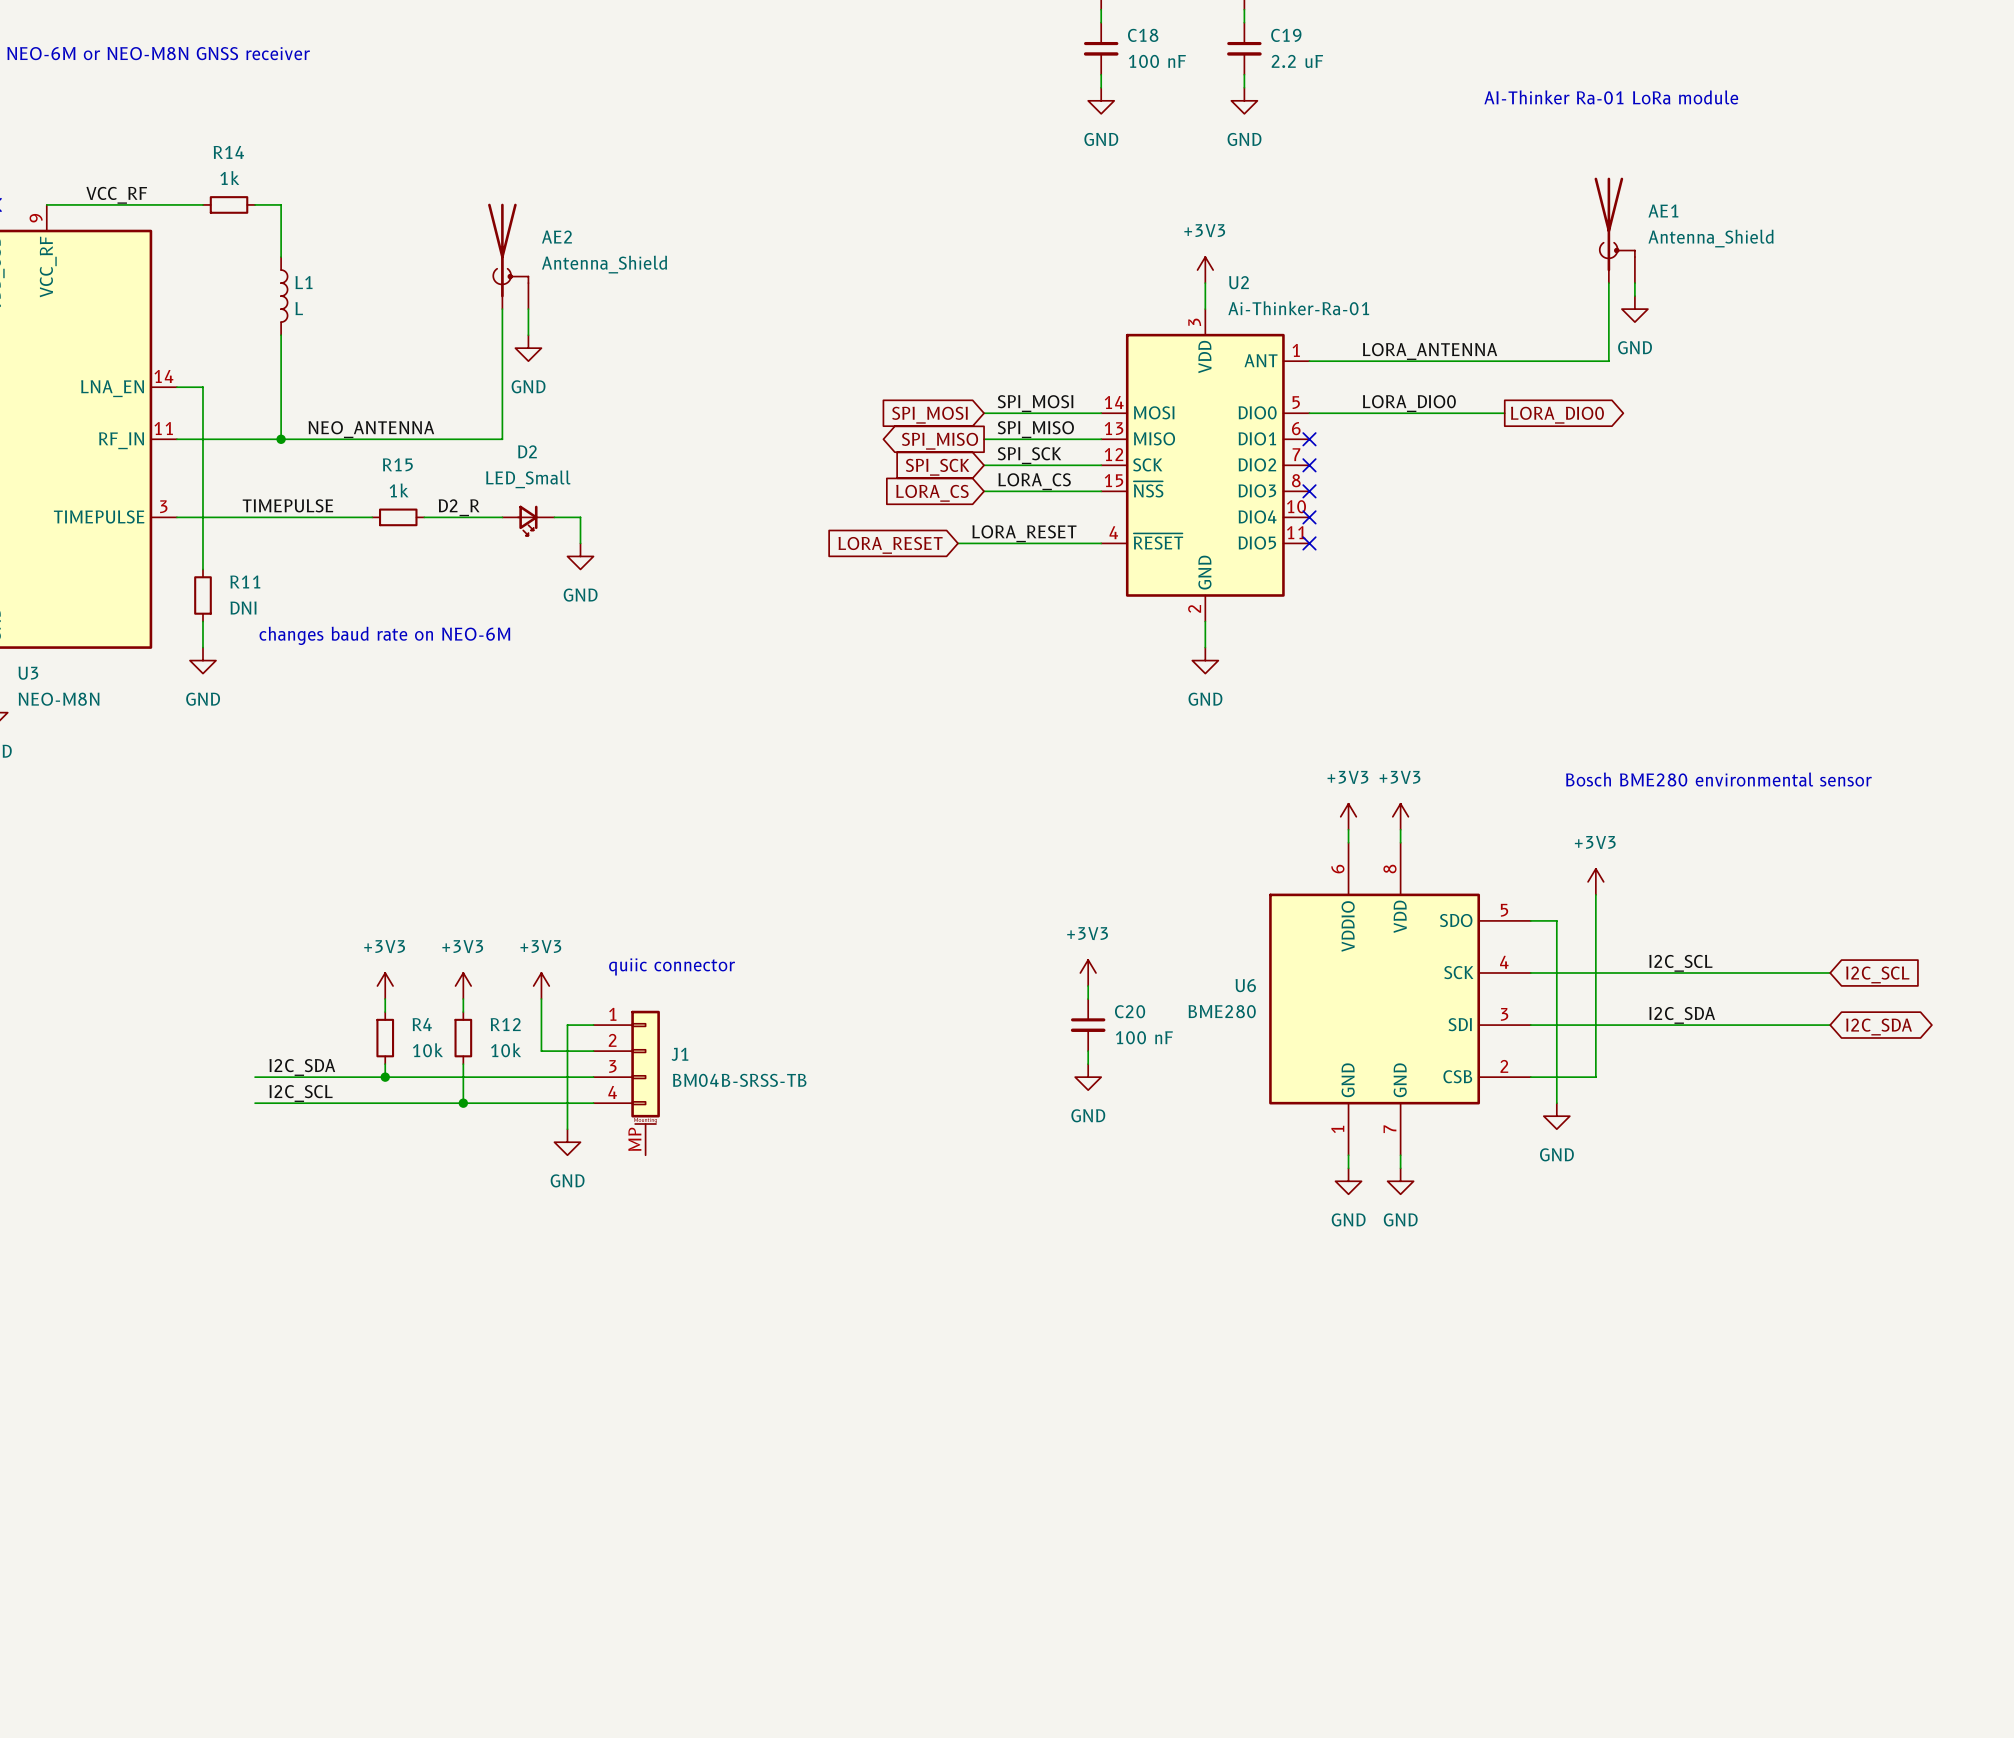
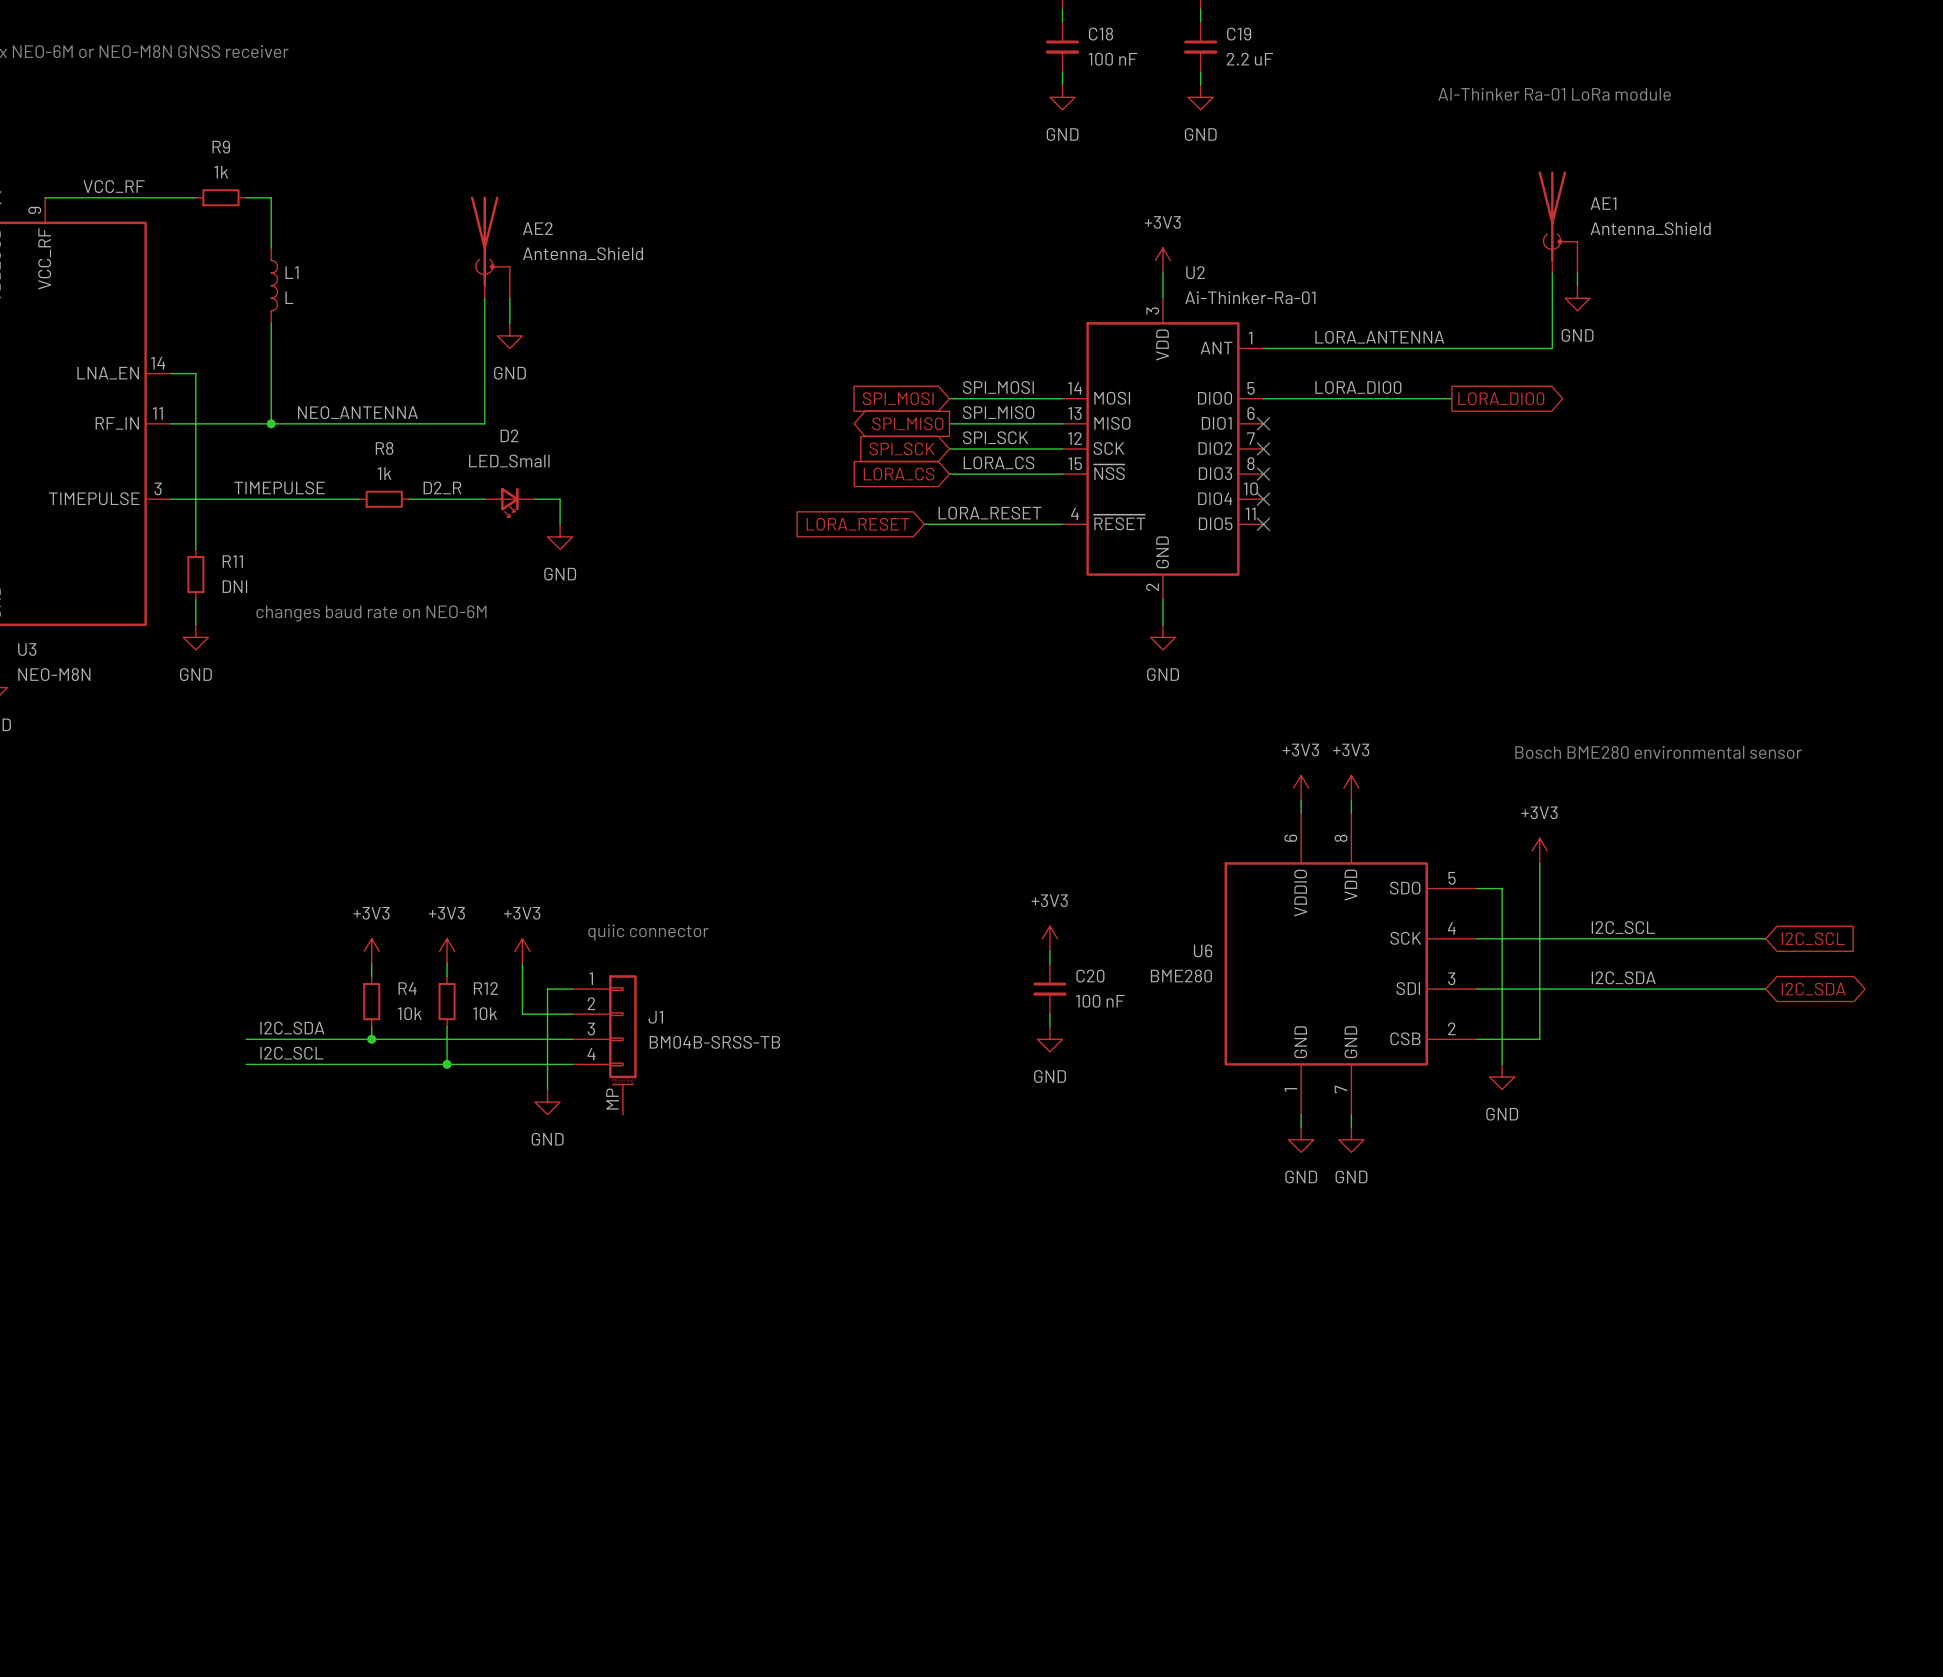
R14 name: R14 (228, 152) -> R9 (221, 147)
R15 name: R15 (397, 464) -> R8 (384, 448)

